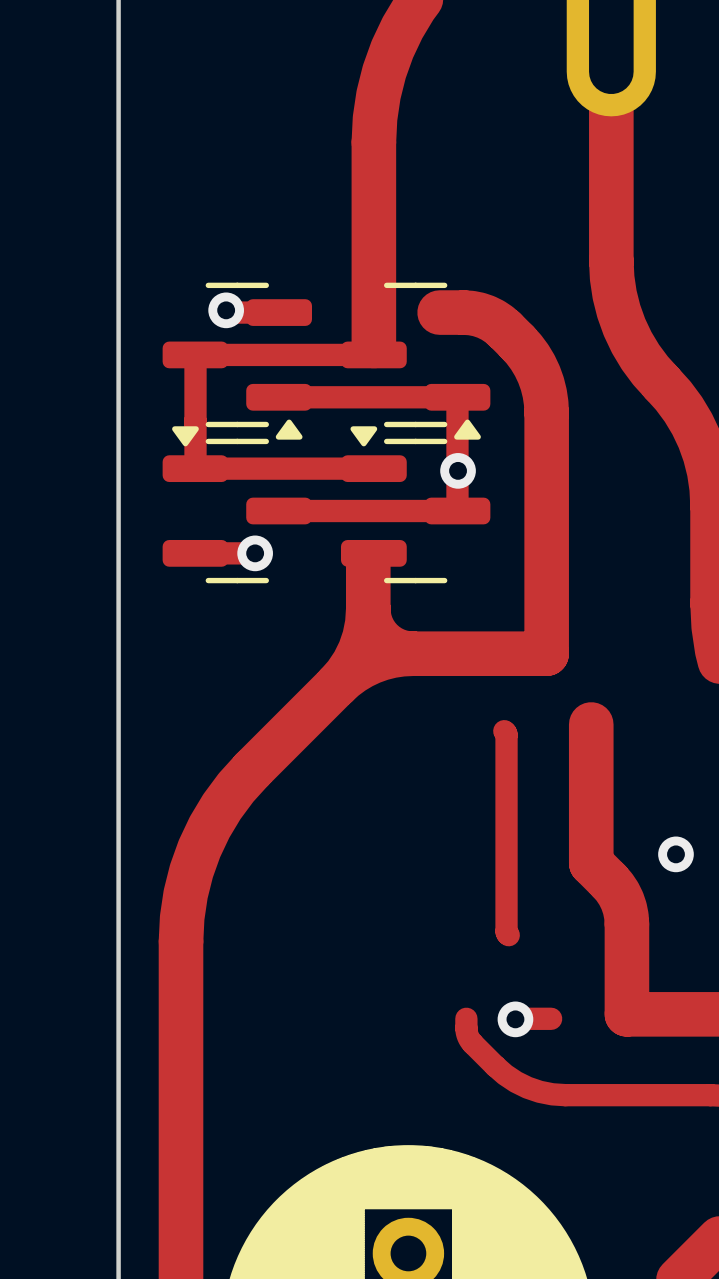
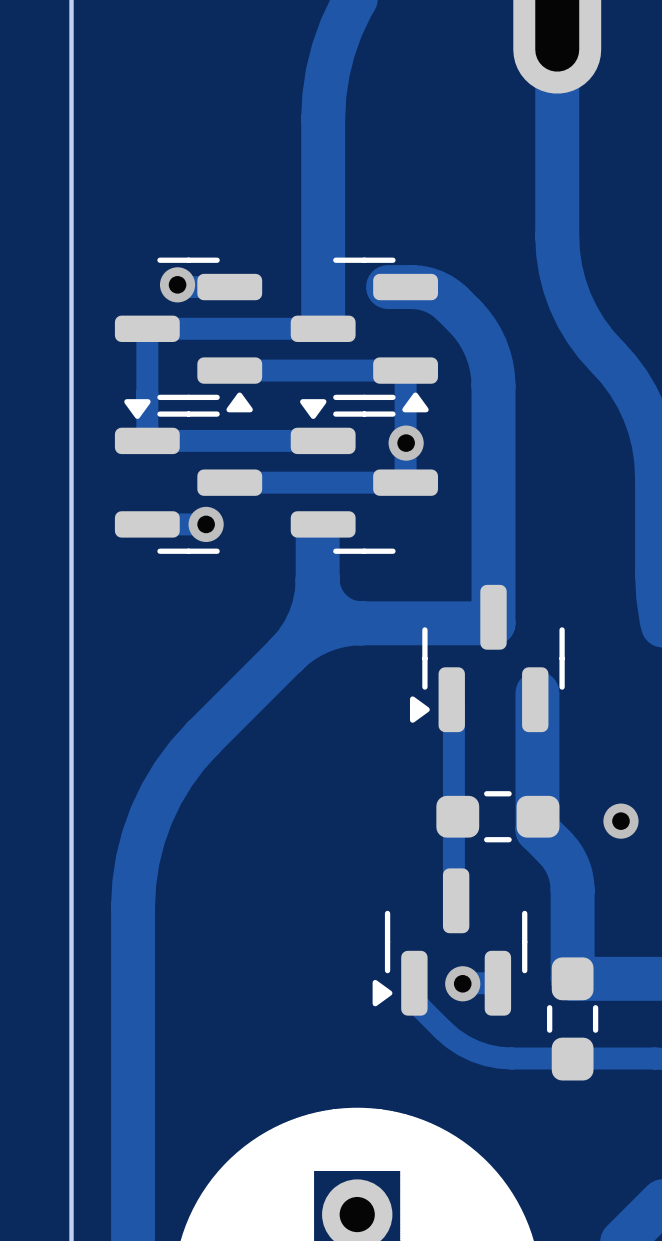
part: none -> (487, 658)
part: none -> (497, 816)
part: none -> (449, 942)
part: none -> (572, 1018)

